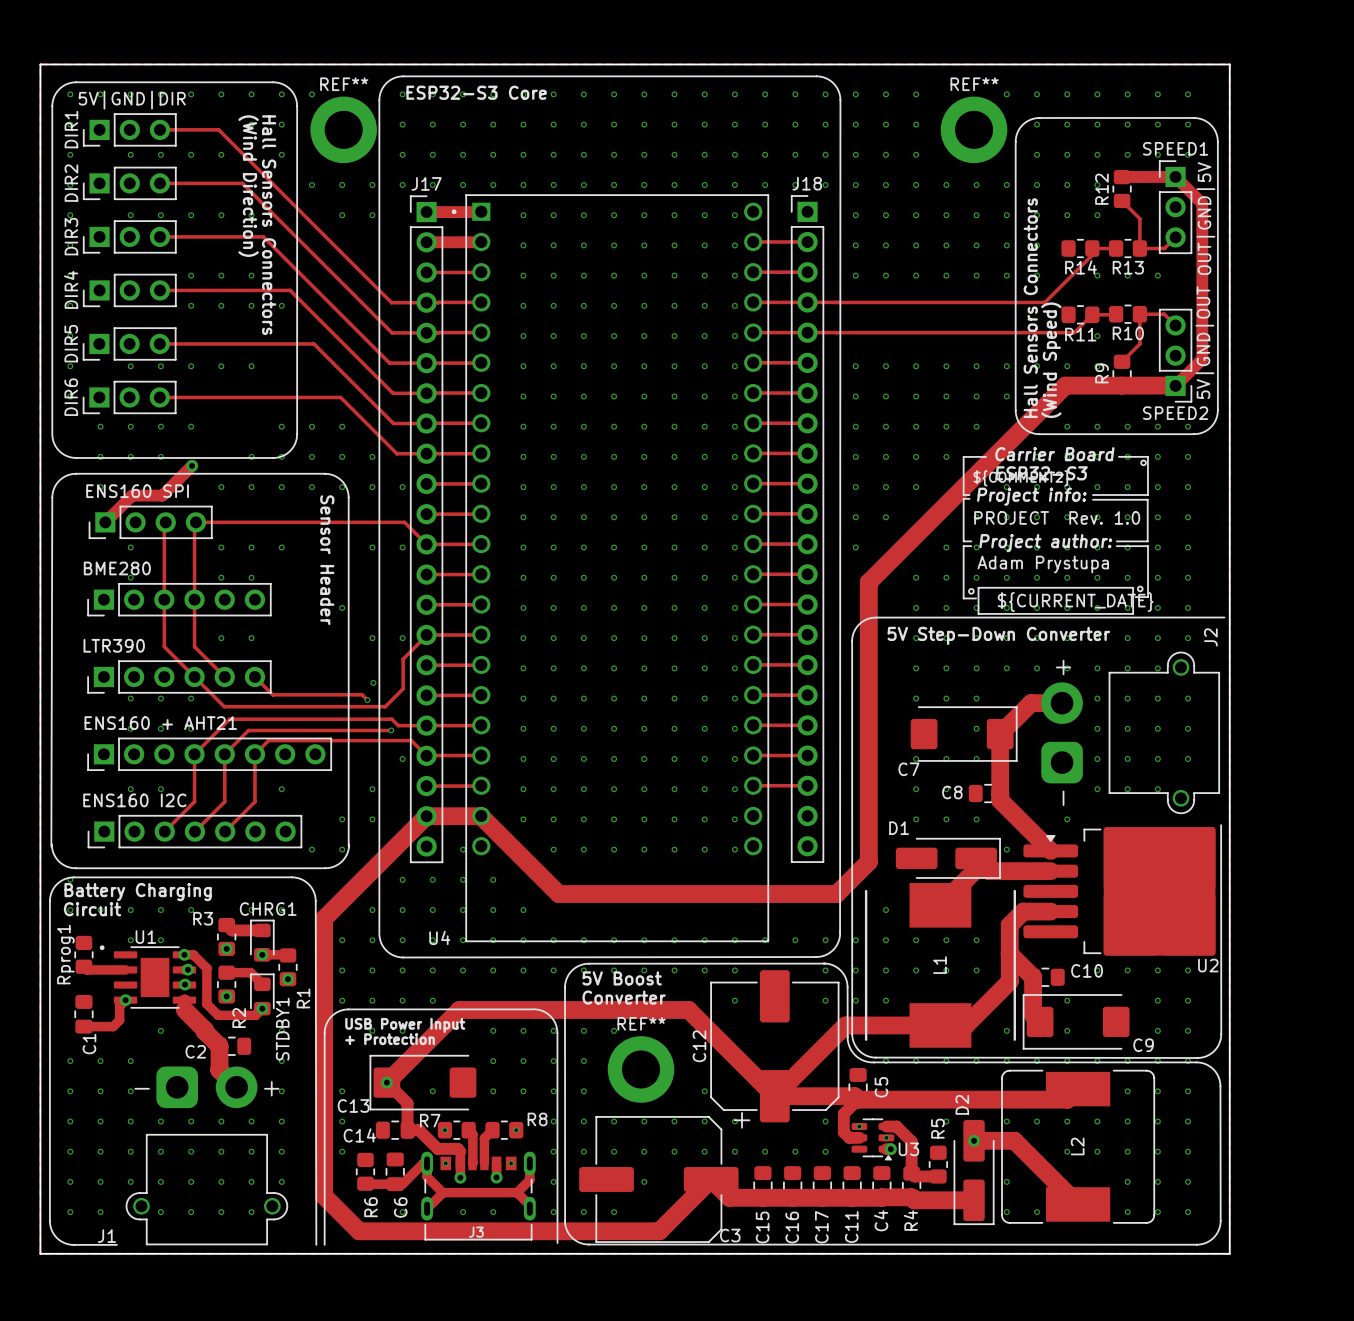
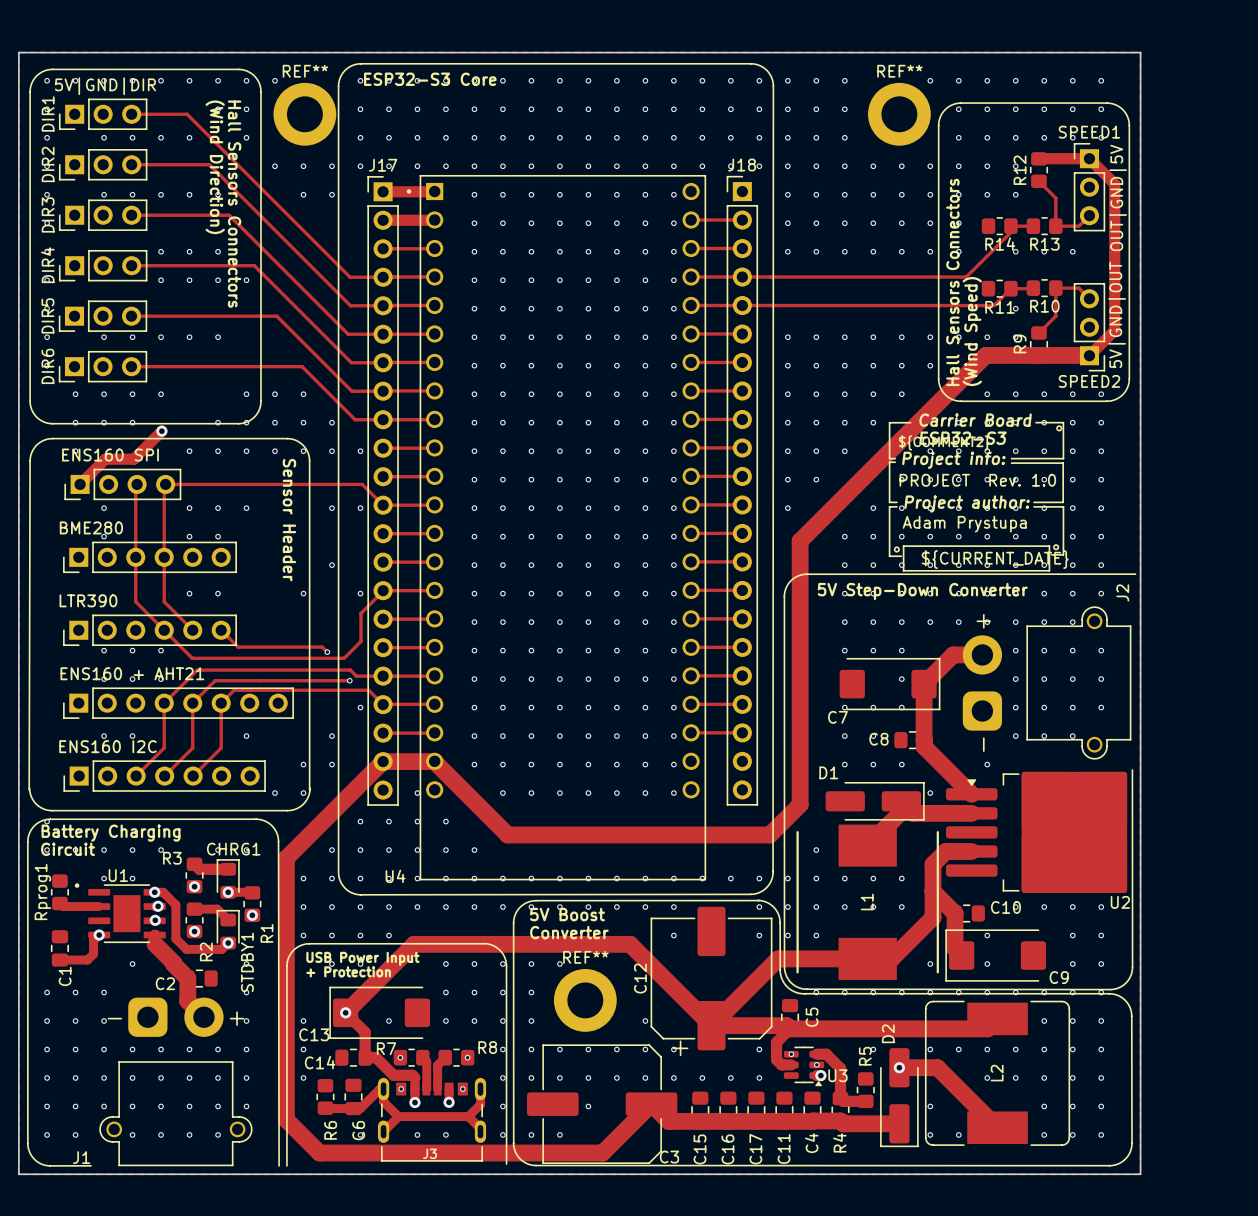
via: (342, 607) -> none
via: none -> (331, 565)
via: none -> (303, 593)
via: (372, 638) -> none
via: (373, 682) -> none

